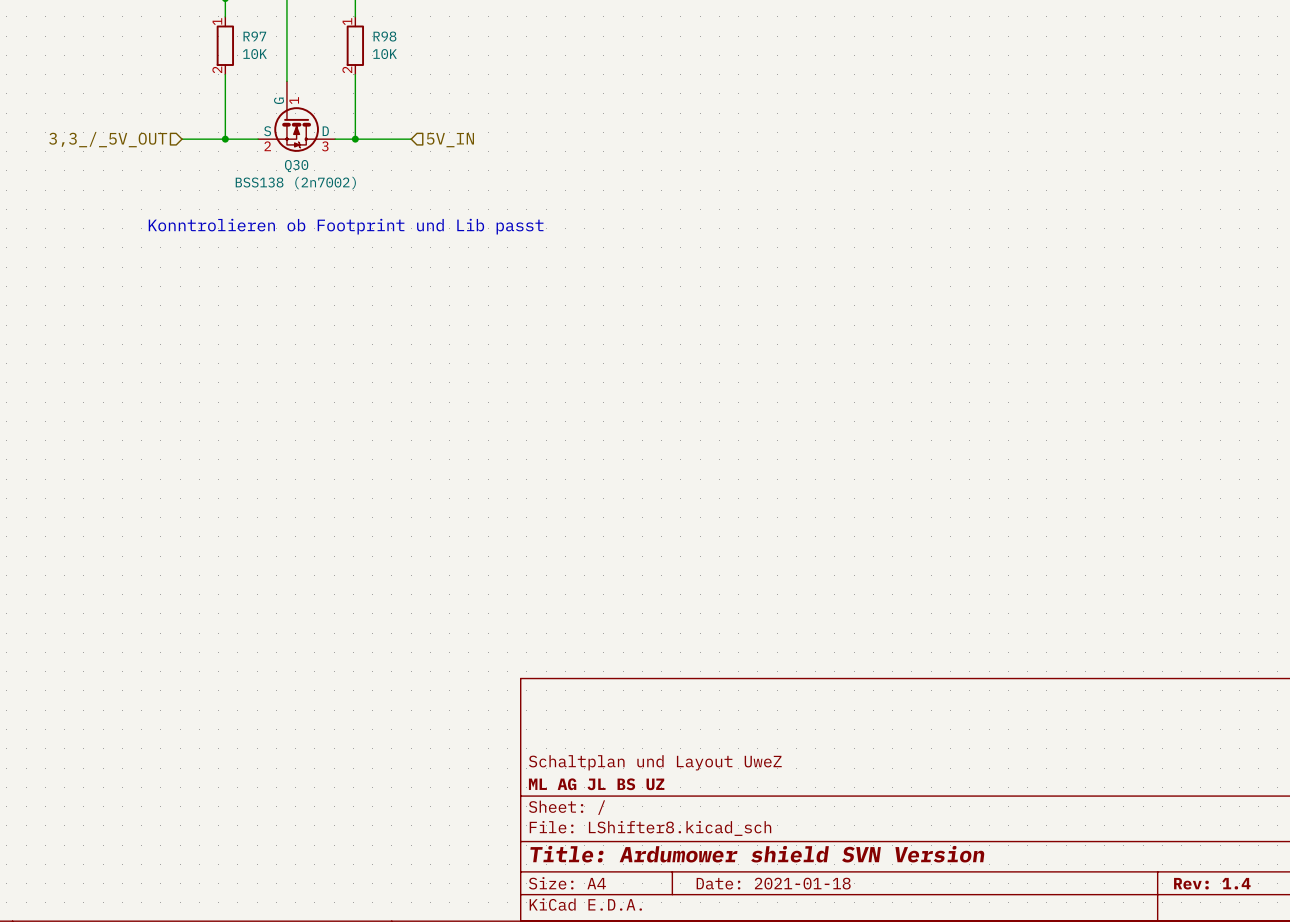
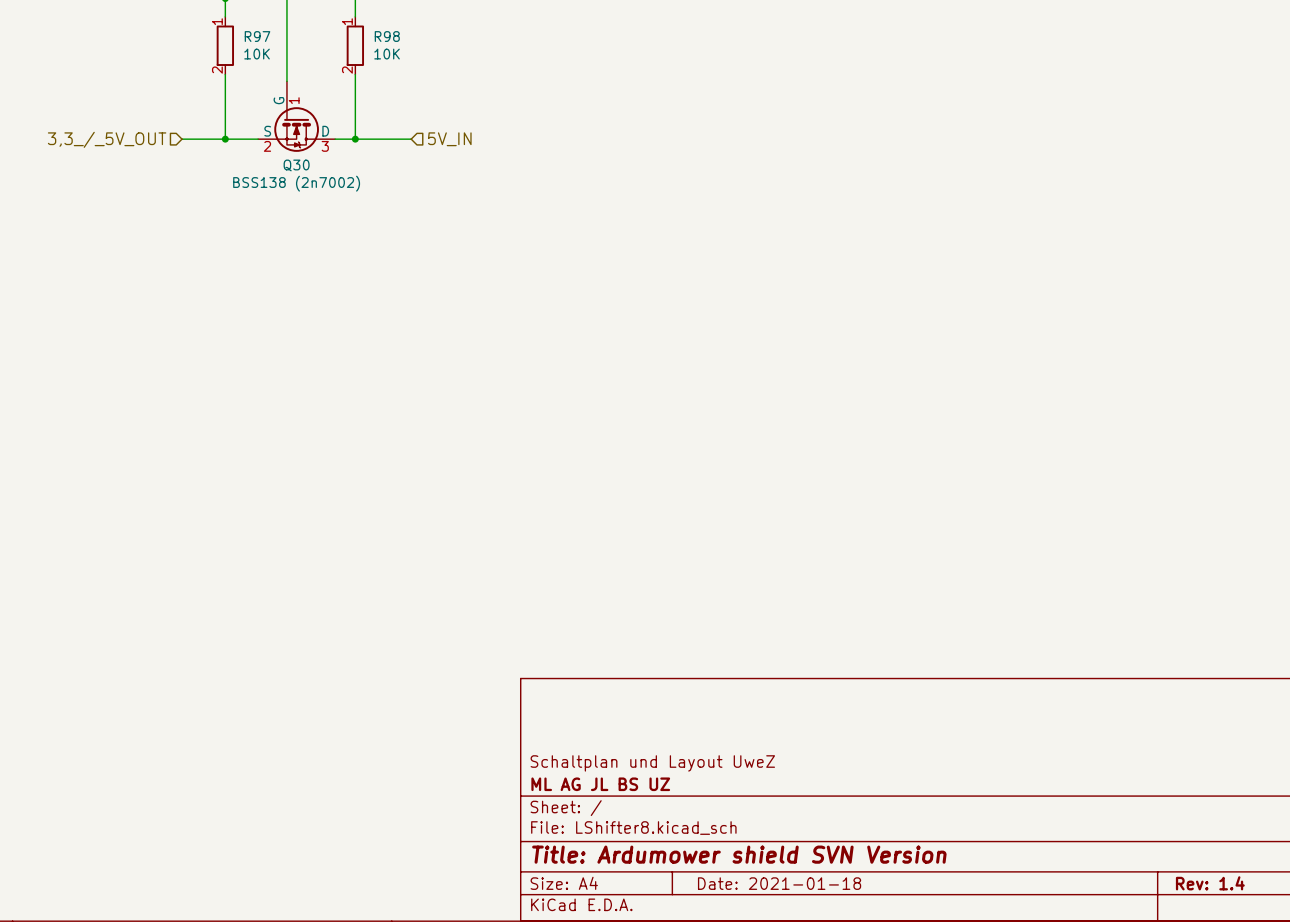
text: Konntrolieren ob Footprint und Lib passt (346, 226) -> none

